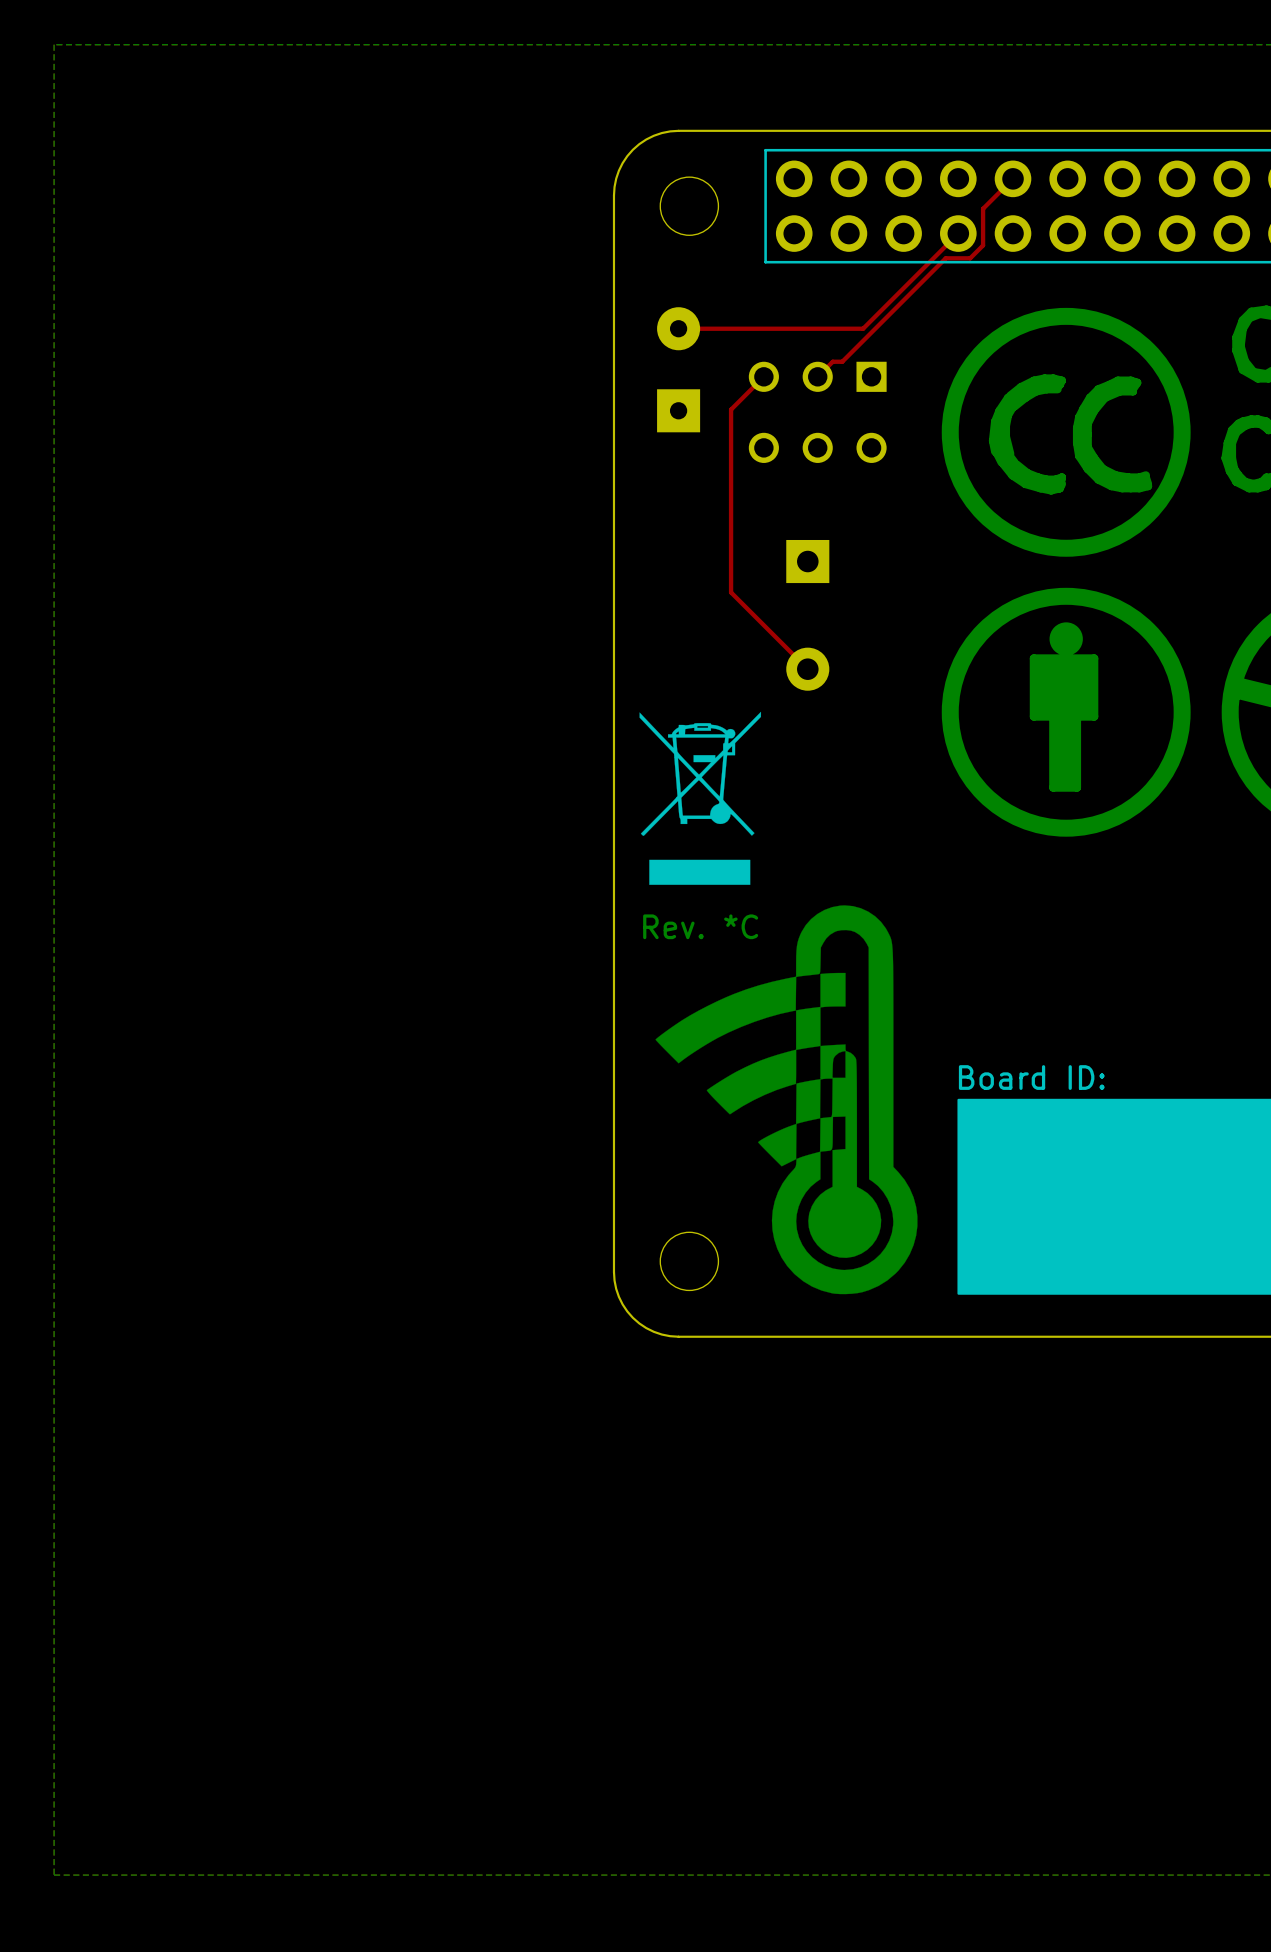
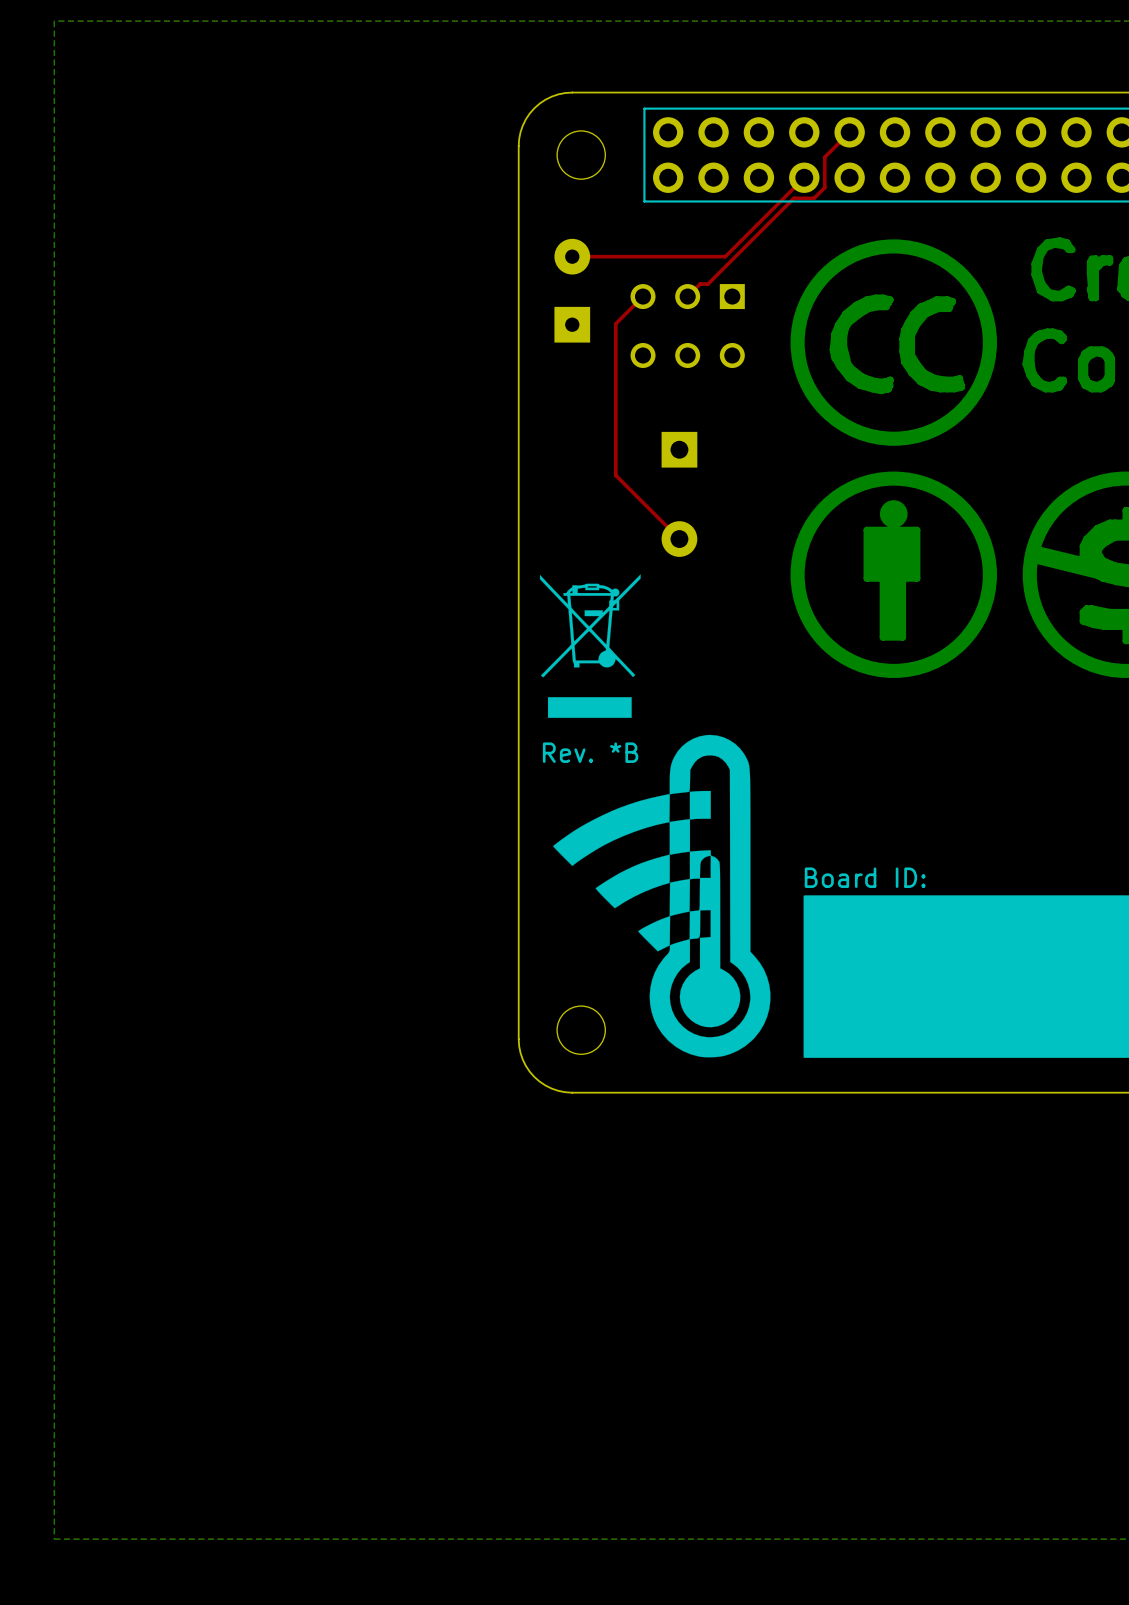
drawing shape: [655, 905, 918, 1295] -> [553, 734, 771, 1058]
text: Rev. *C (700, 926) -> Rev. *B (590, 752)

